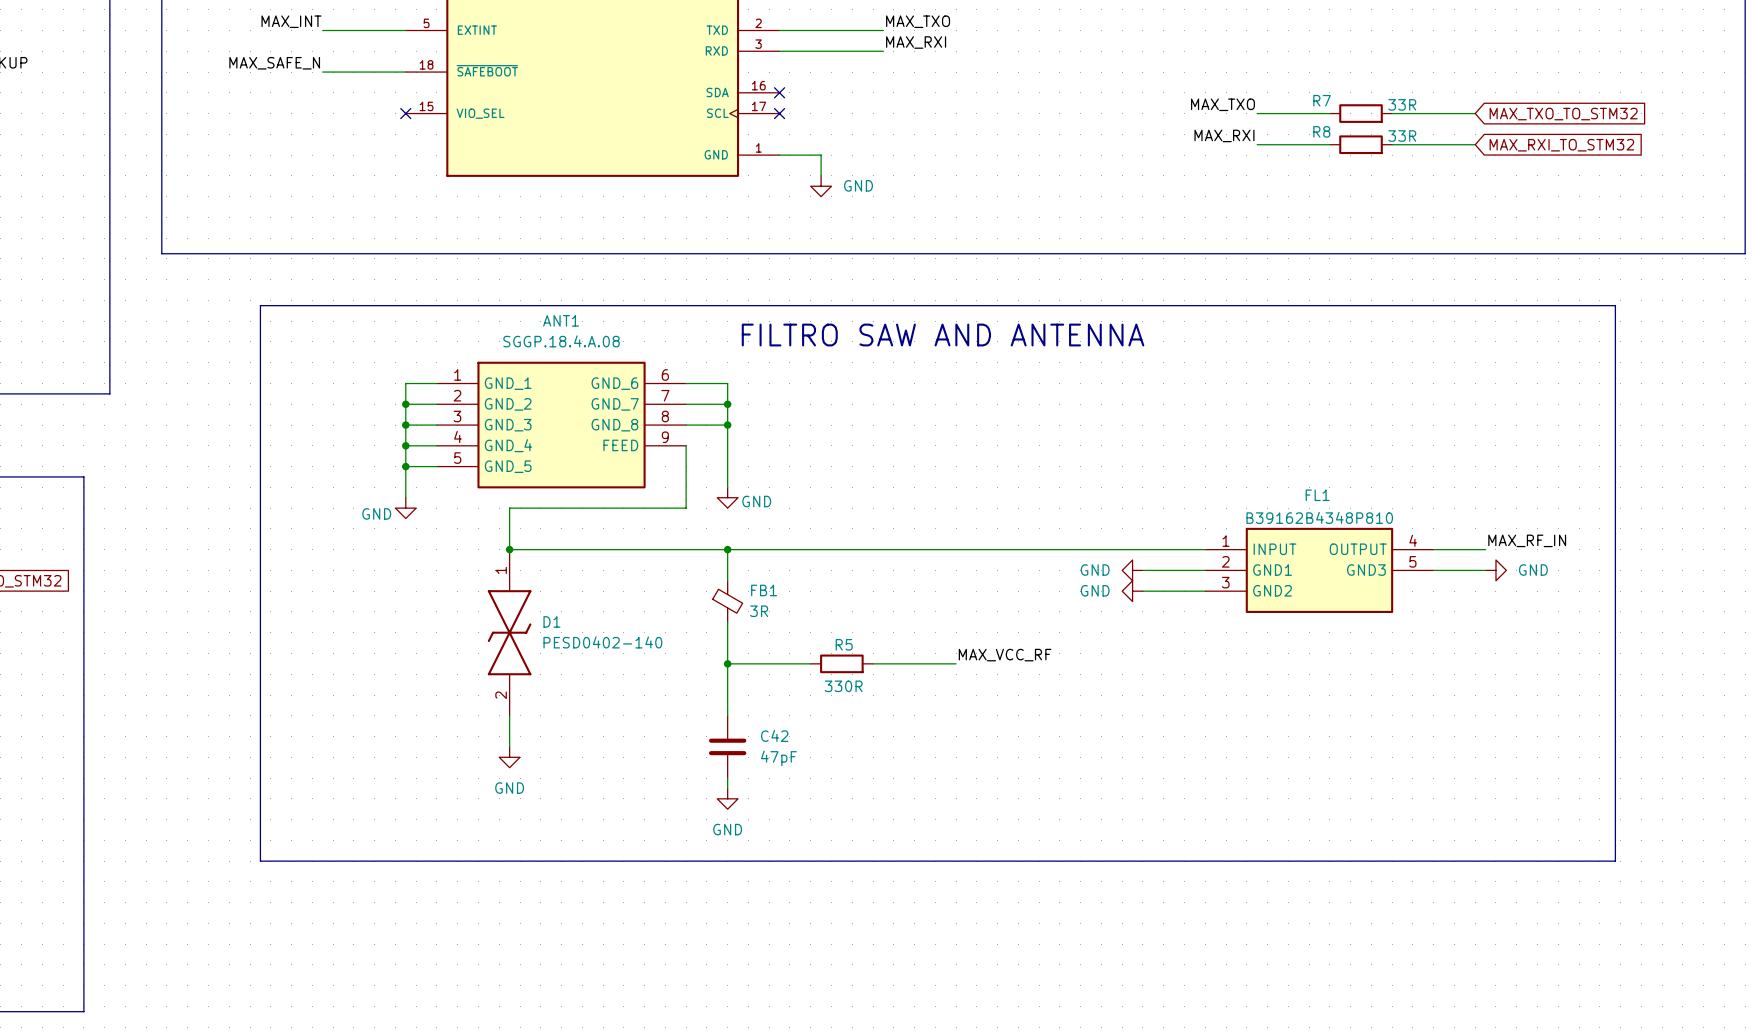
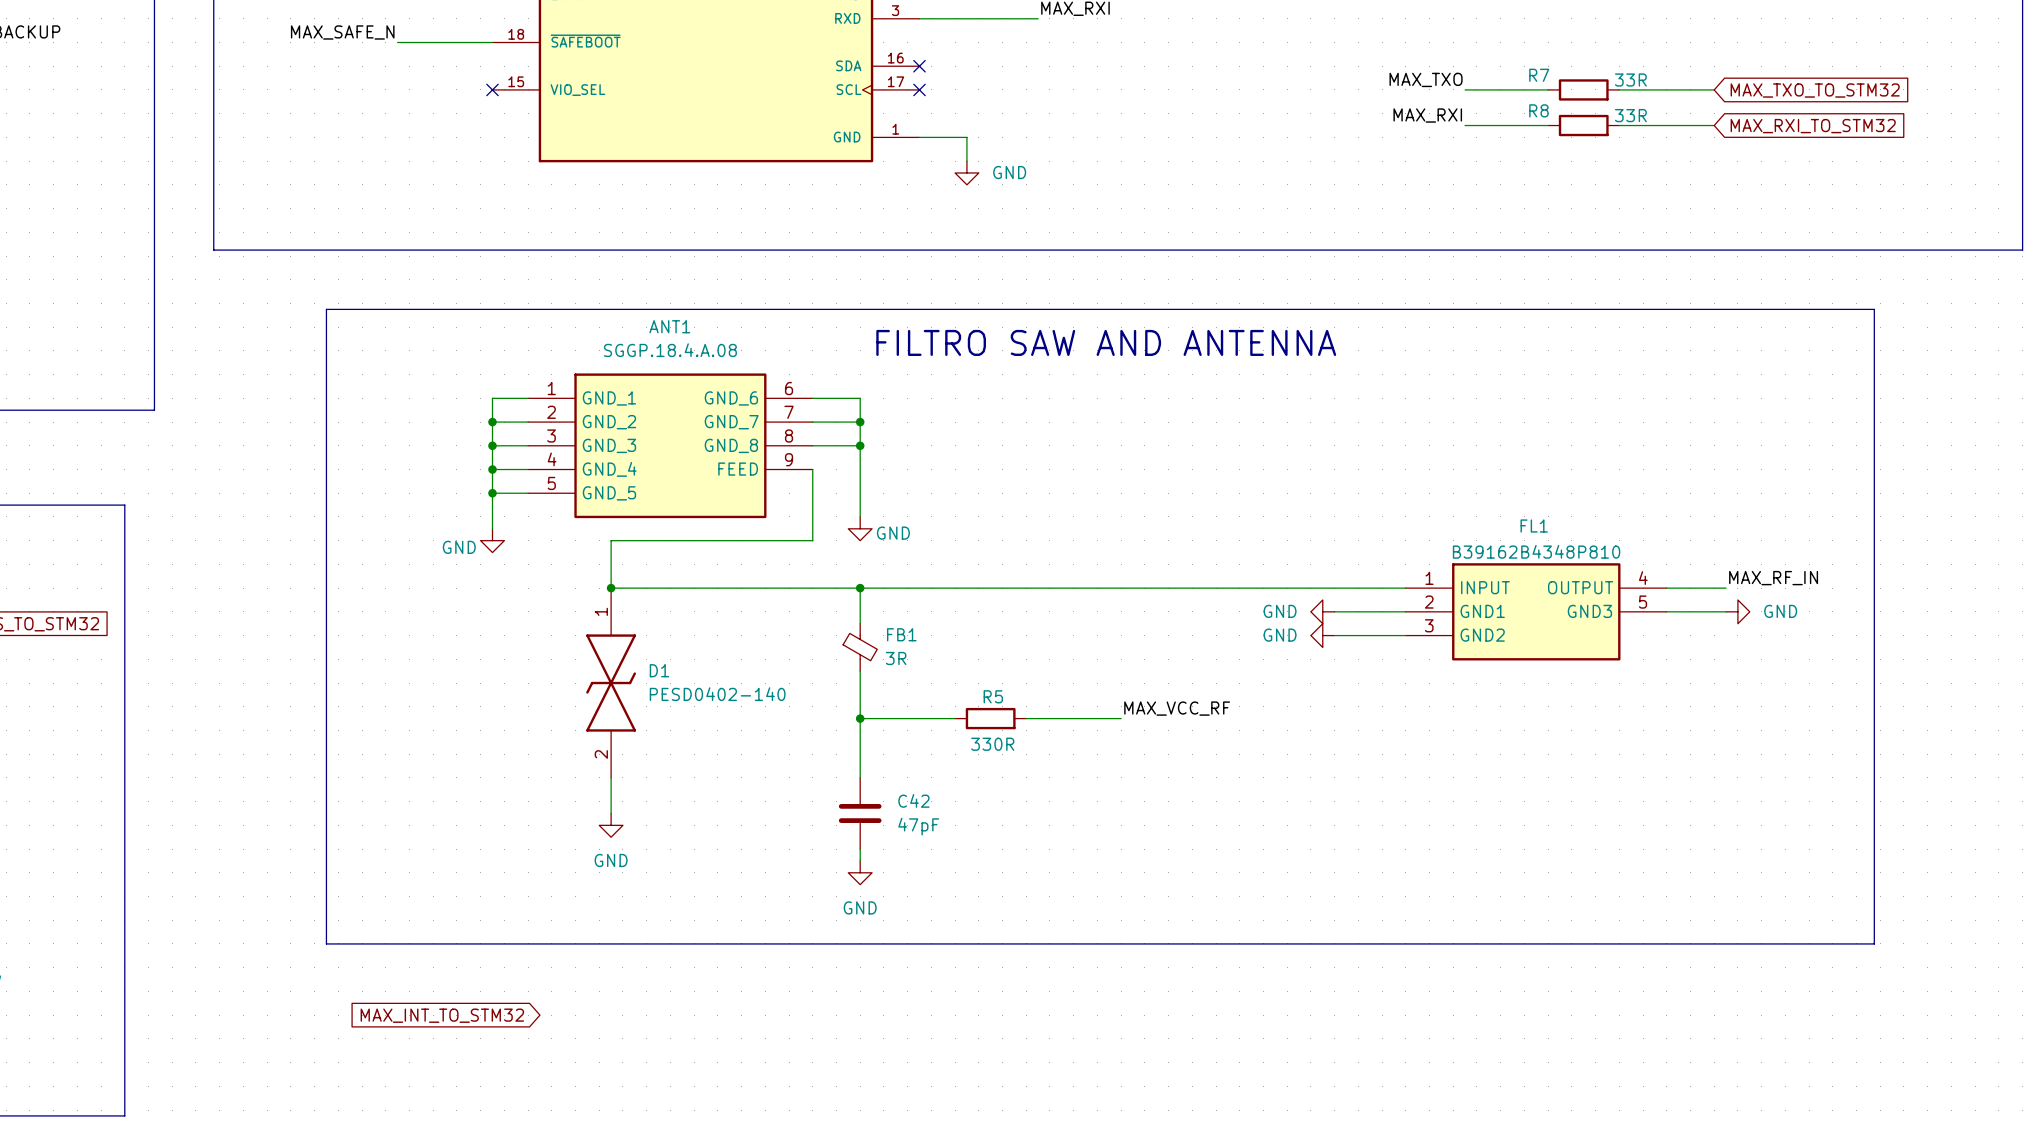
global label: none -> MAX_INT_TO_STM32 (442, 1015)

